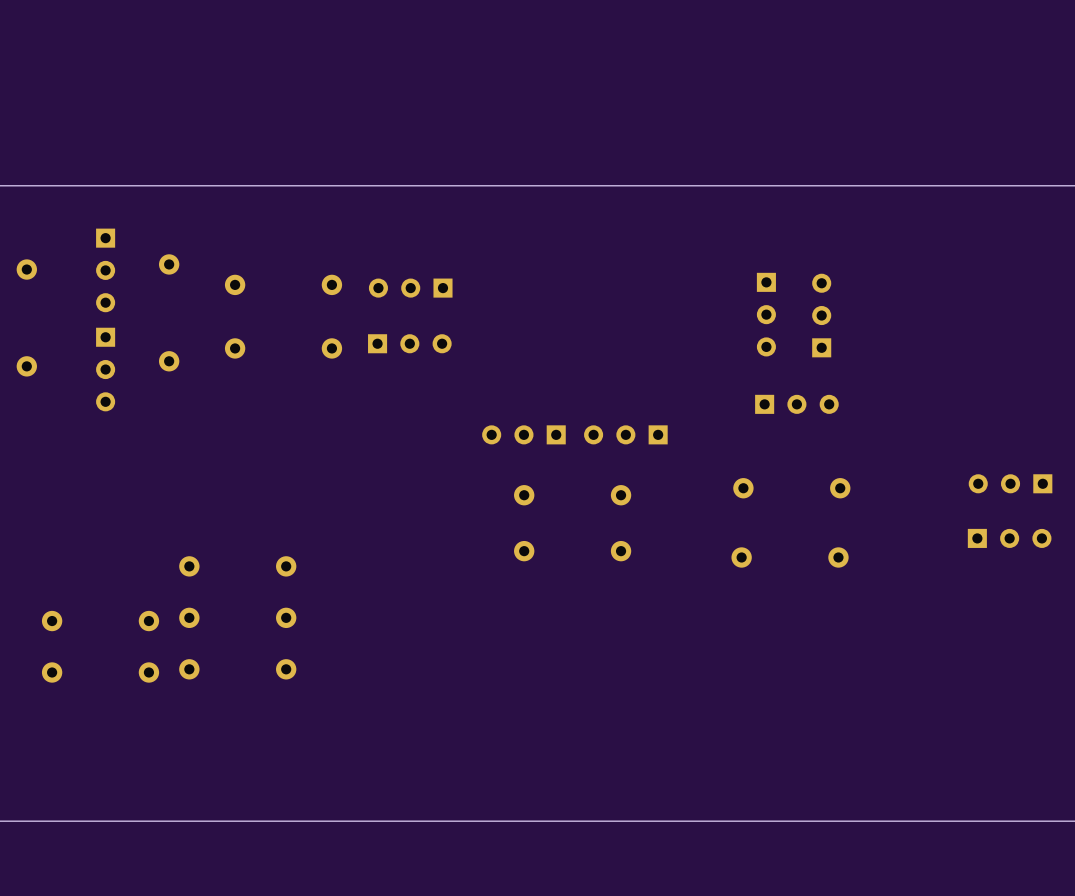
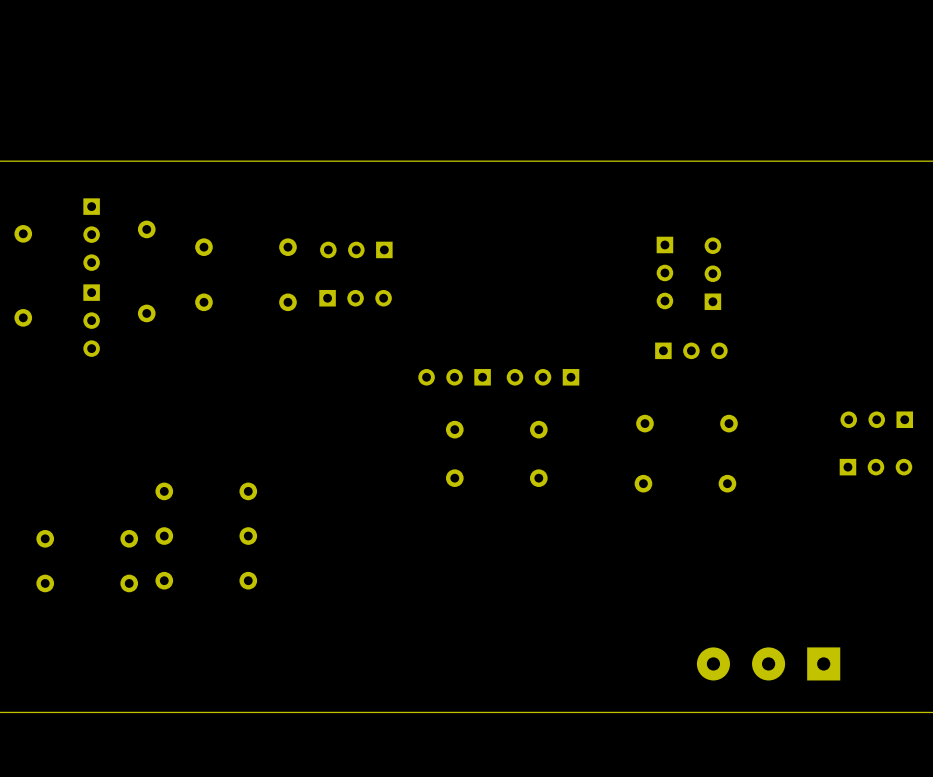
part: none -> (768, 663)

